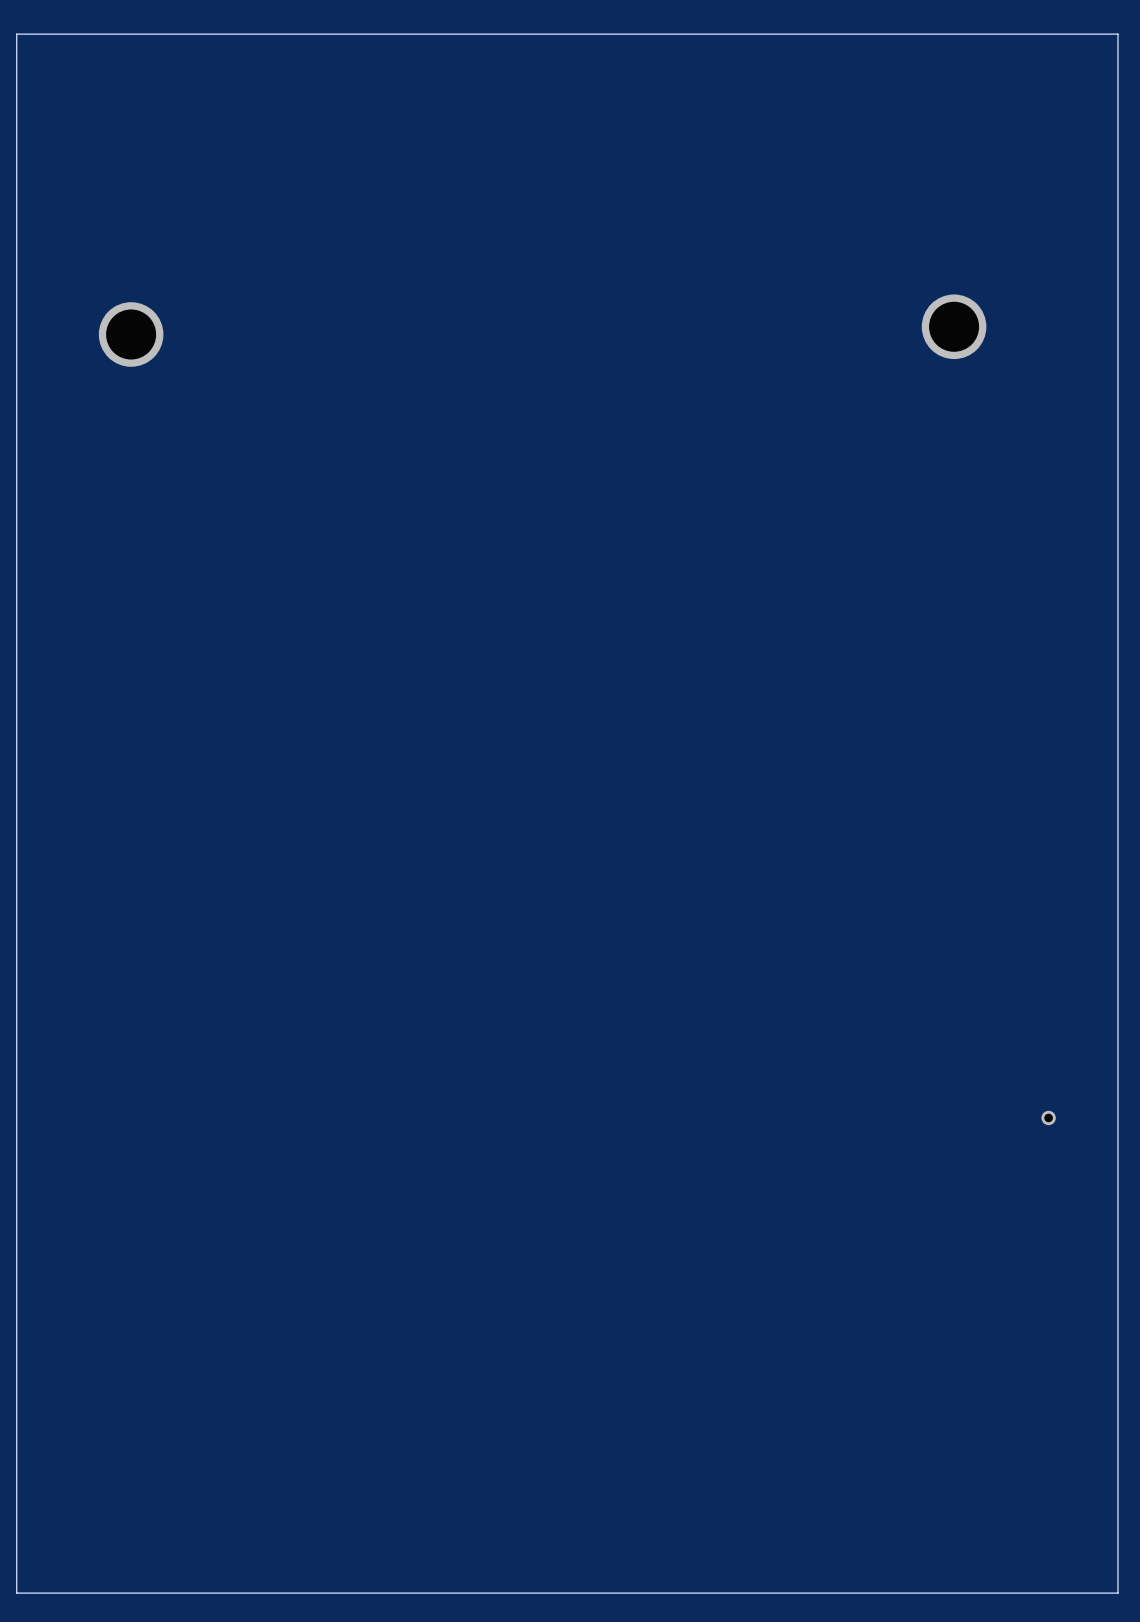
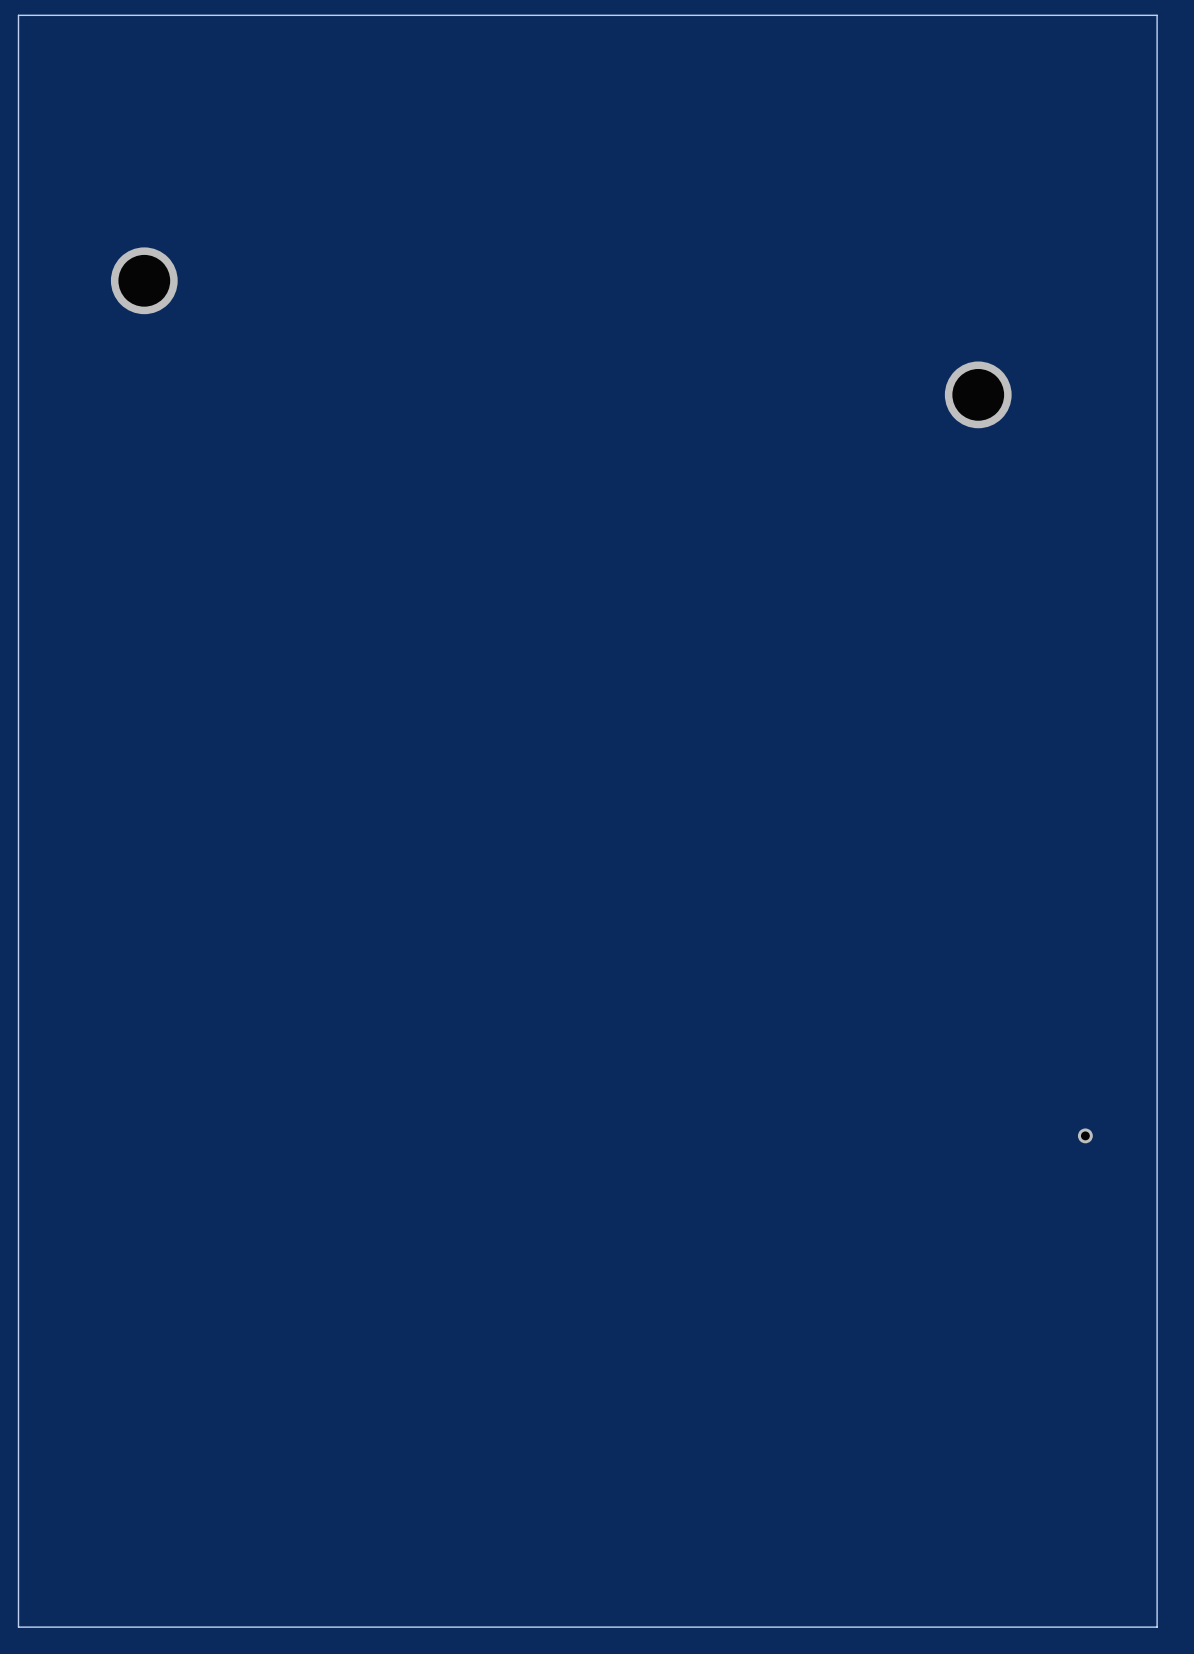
via position: (954, 326) -> (978, 394)
via position: (131, 334) -> (144, 280)

